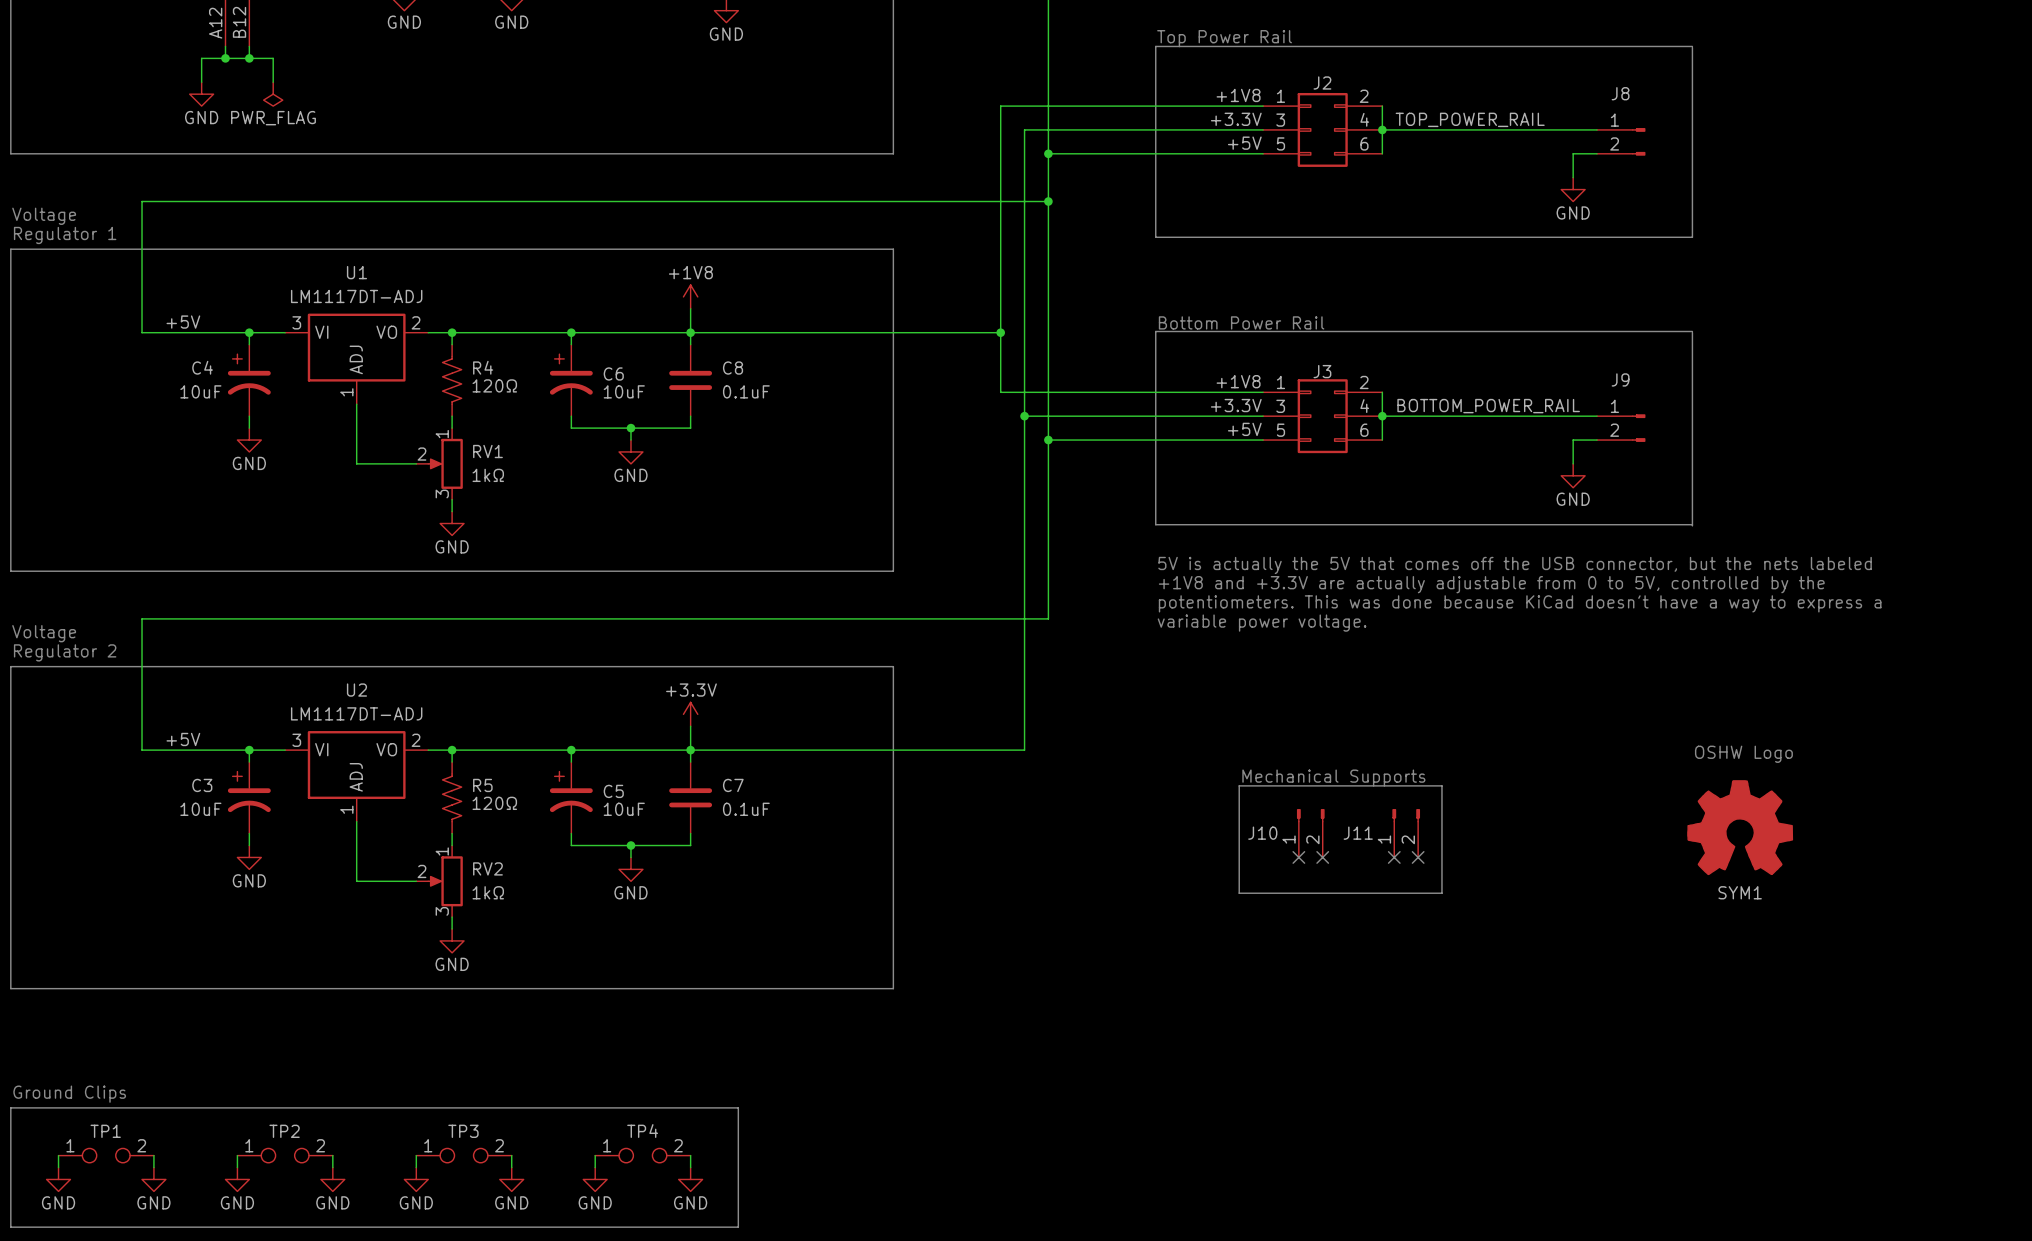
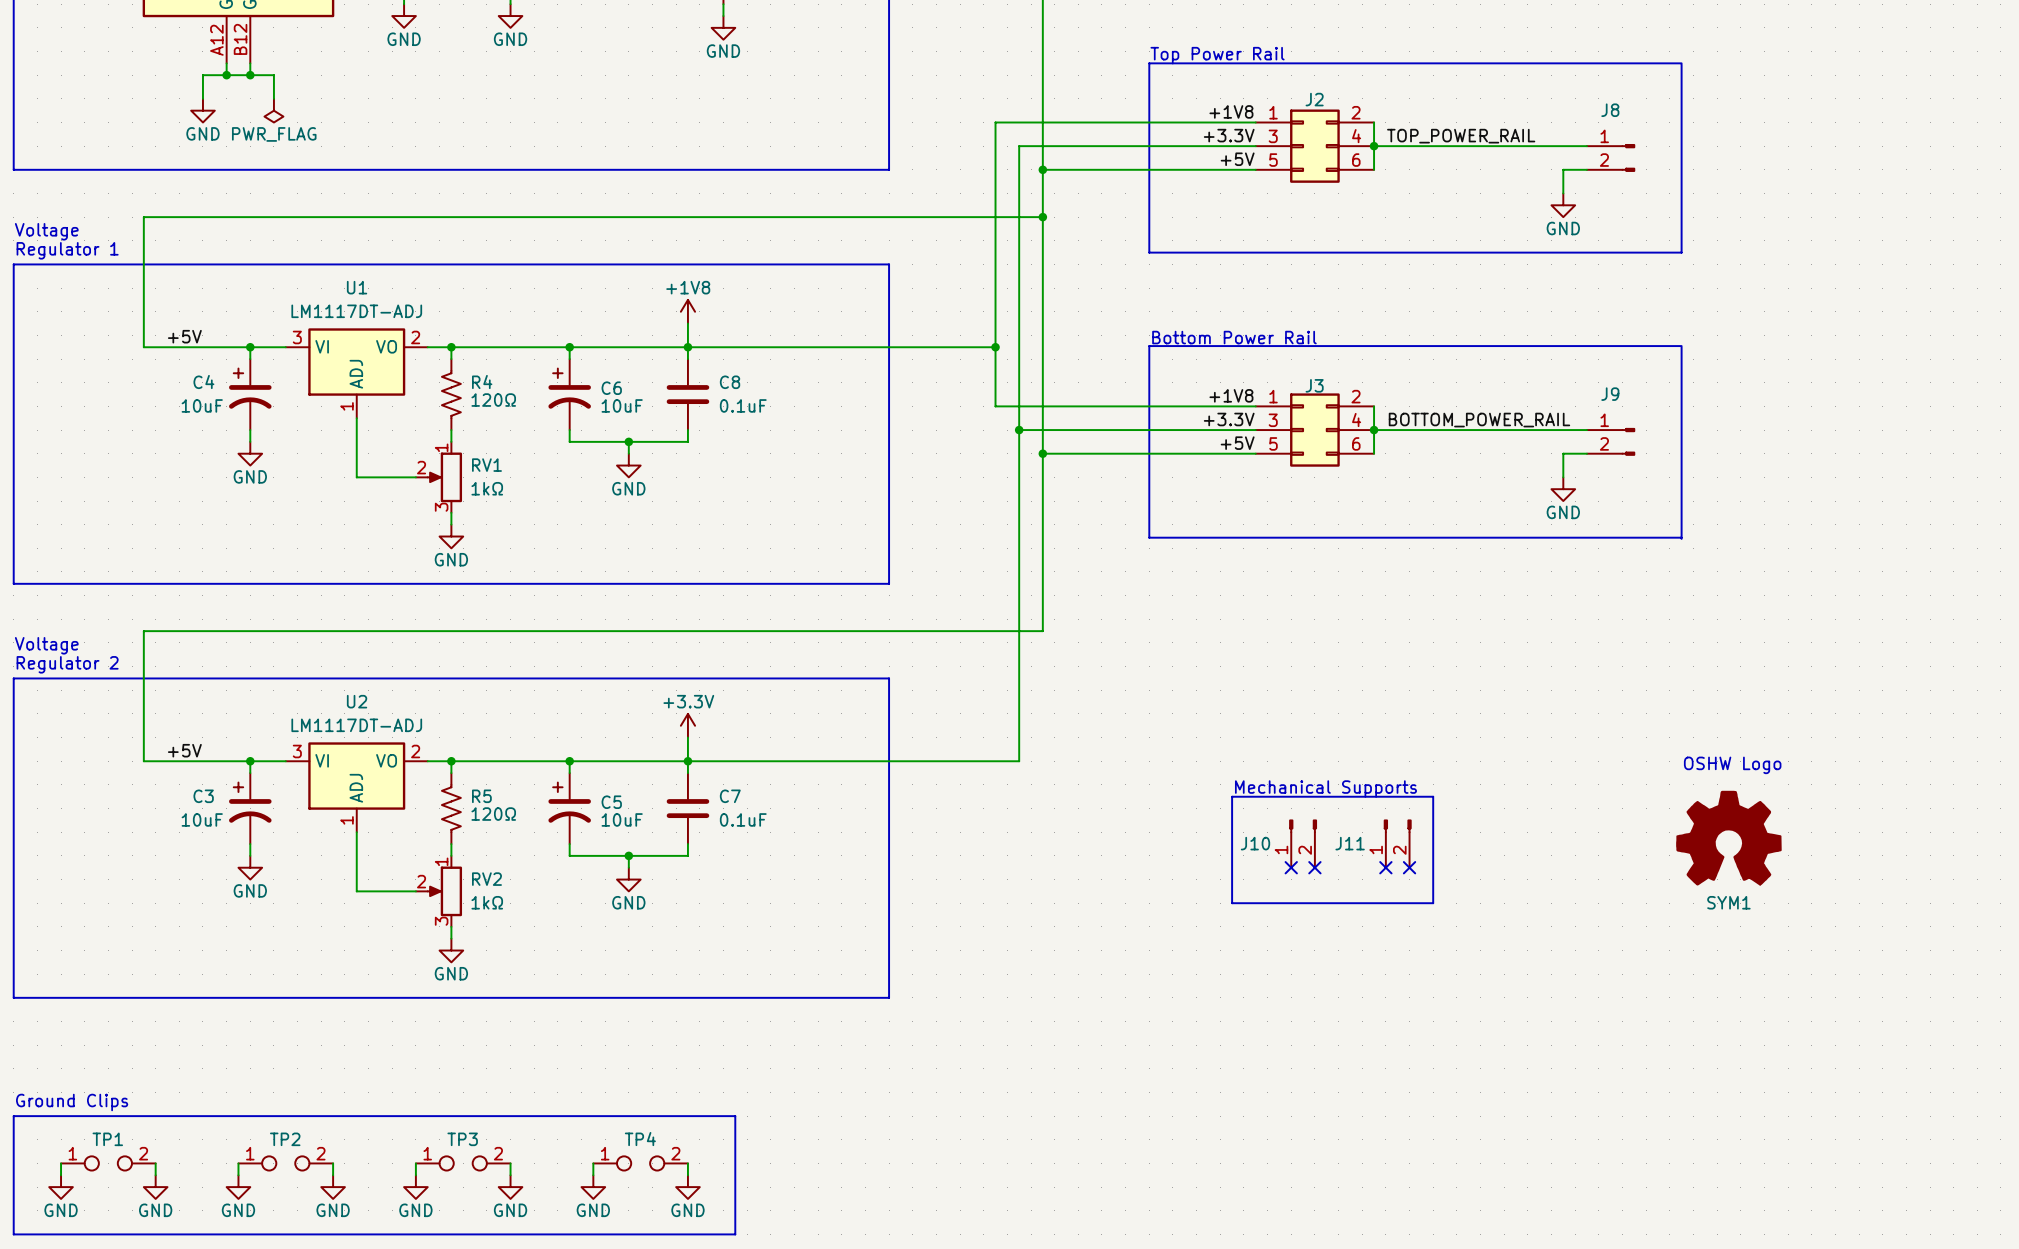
text: 5V is actually the 5V that comes off the USB connector, but the nets labeled (1515, 565) -> none
text: +1V8 and +3.3V are actually adjustable from 0 to 5V, controlled by the (1491, 584) -> none
text: potentiometers. This was done because KiCad doesn't have a way to express a (1520, 603) -> none
text: variable power voltage. (1262, 623) -> none

